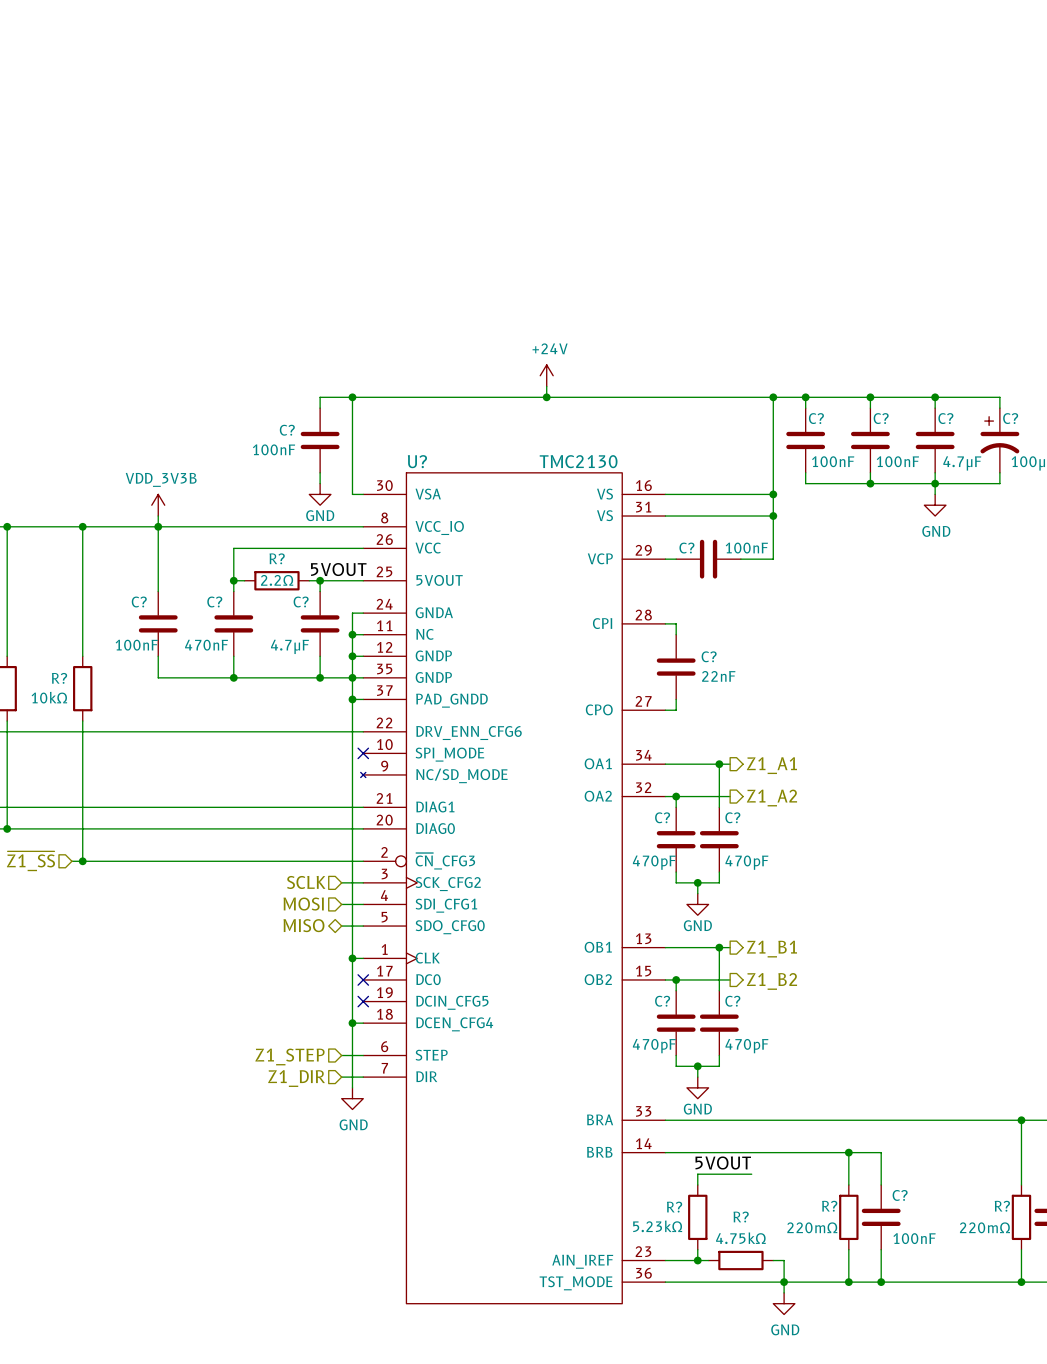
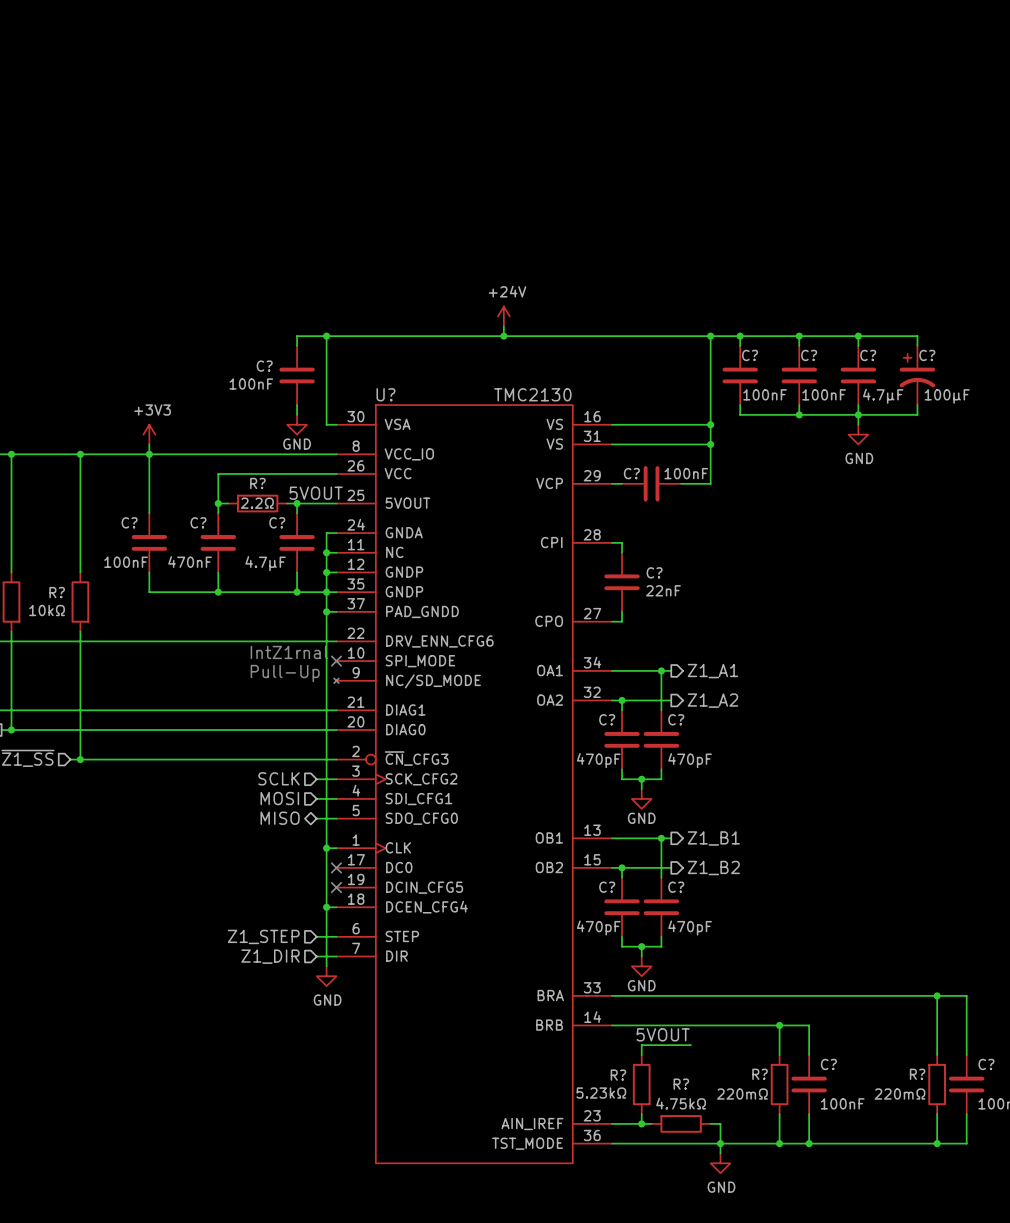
power symbol: VDD_3V3B (158, 505) -> +3V3 (149, 434)
text: none -> IntZ1rnal (289, 652)
text: none -> Pull-Up (285, 673)

